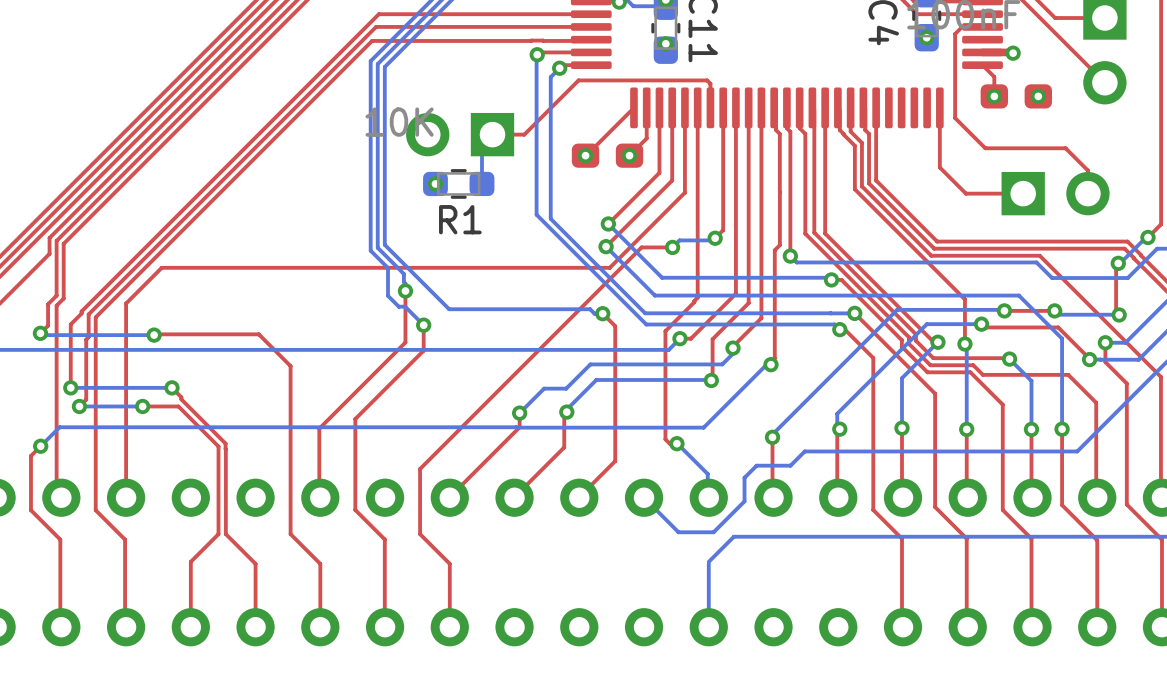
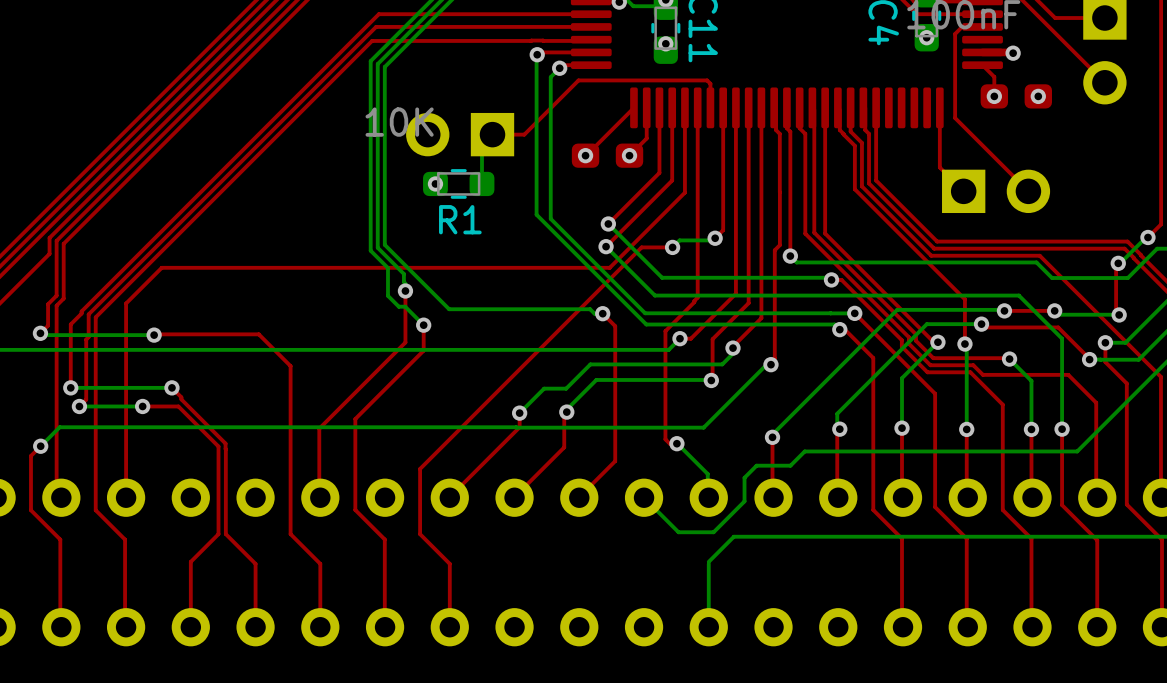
top track: (985, 148) (1065, 148) (1087, 170) (1087, 193) -> (985, 148) (1028, 191)
top track: (963, 191) (965, 193) (1023, 193) -> none
part position: (1055, 193) -> (996, 191)

